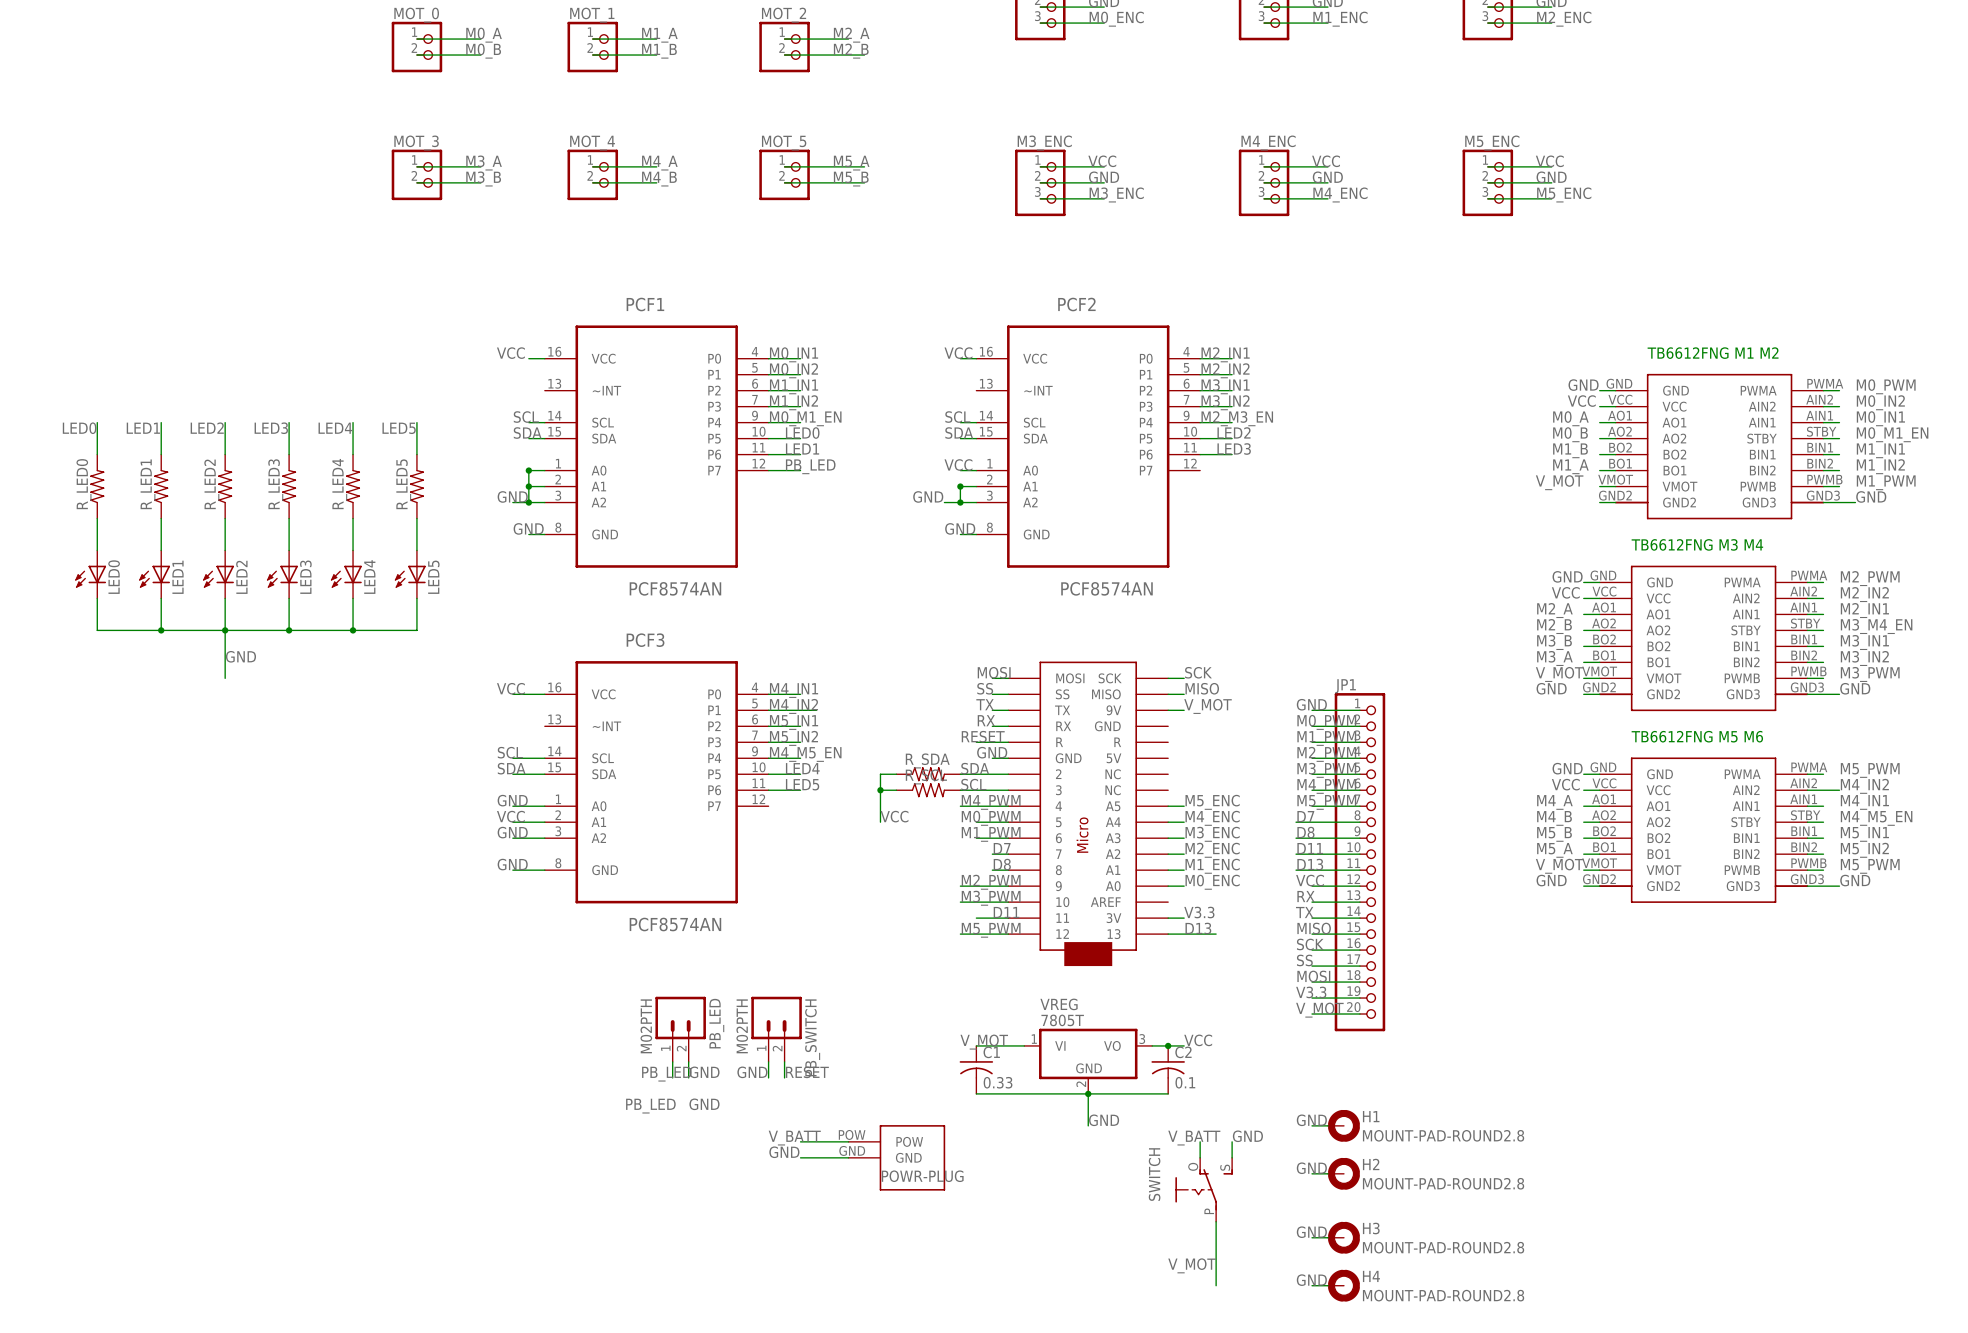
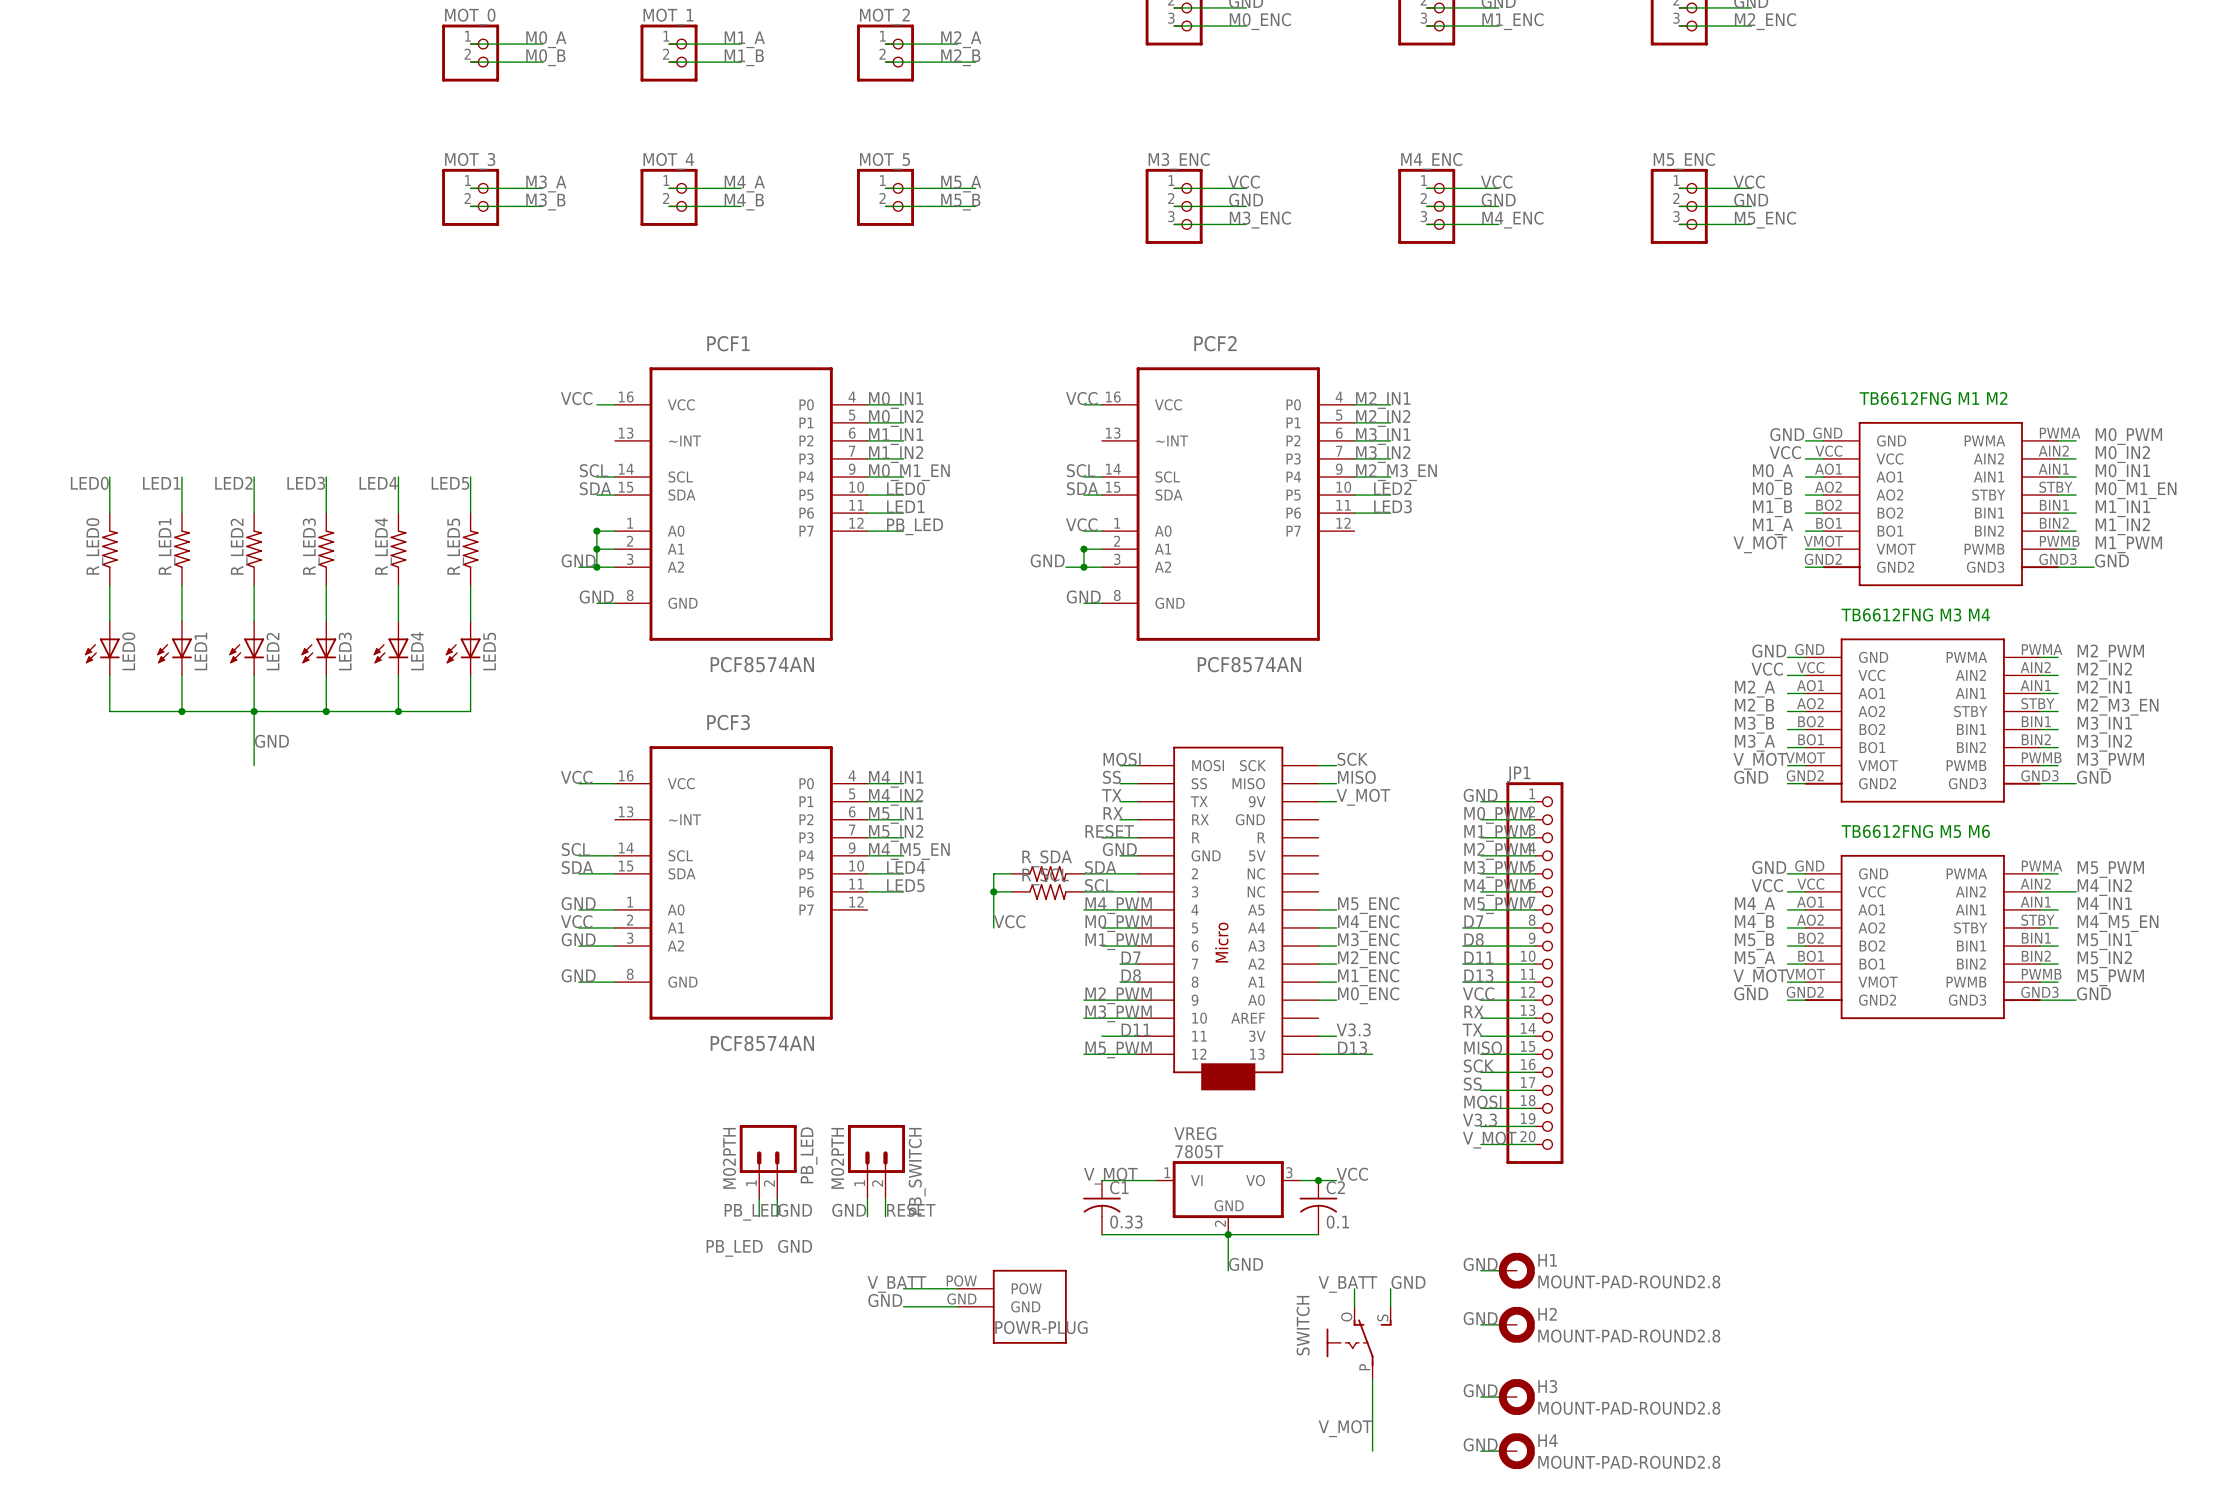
label: M3_M4_EN (1876, 626) -> M2_M3_EN (2118, 707)

